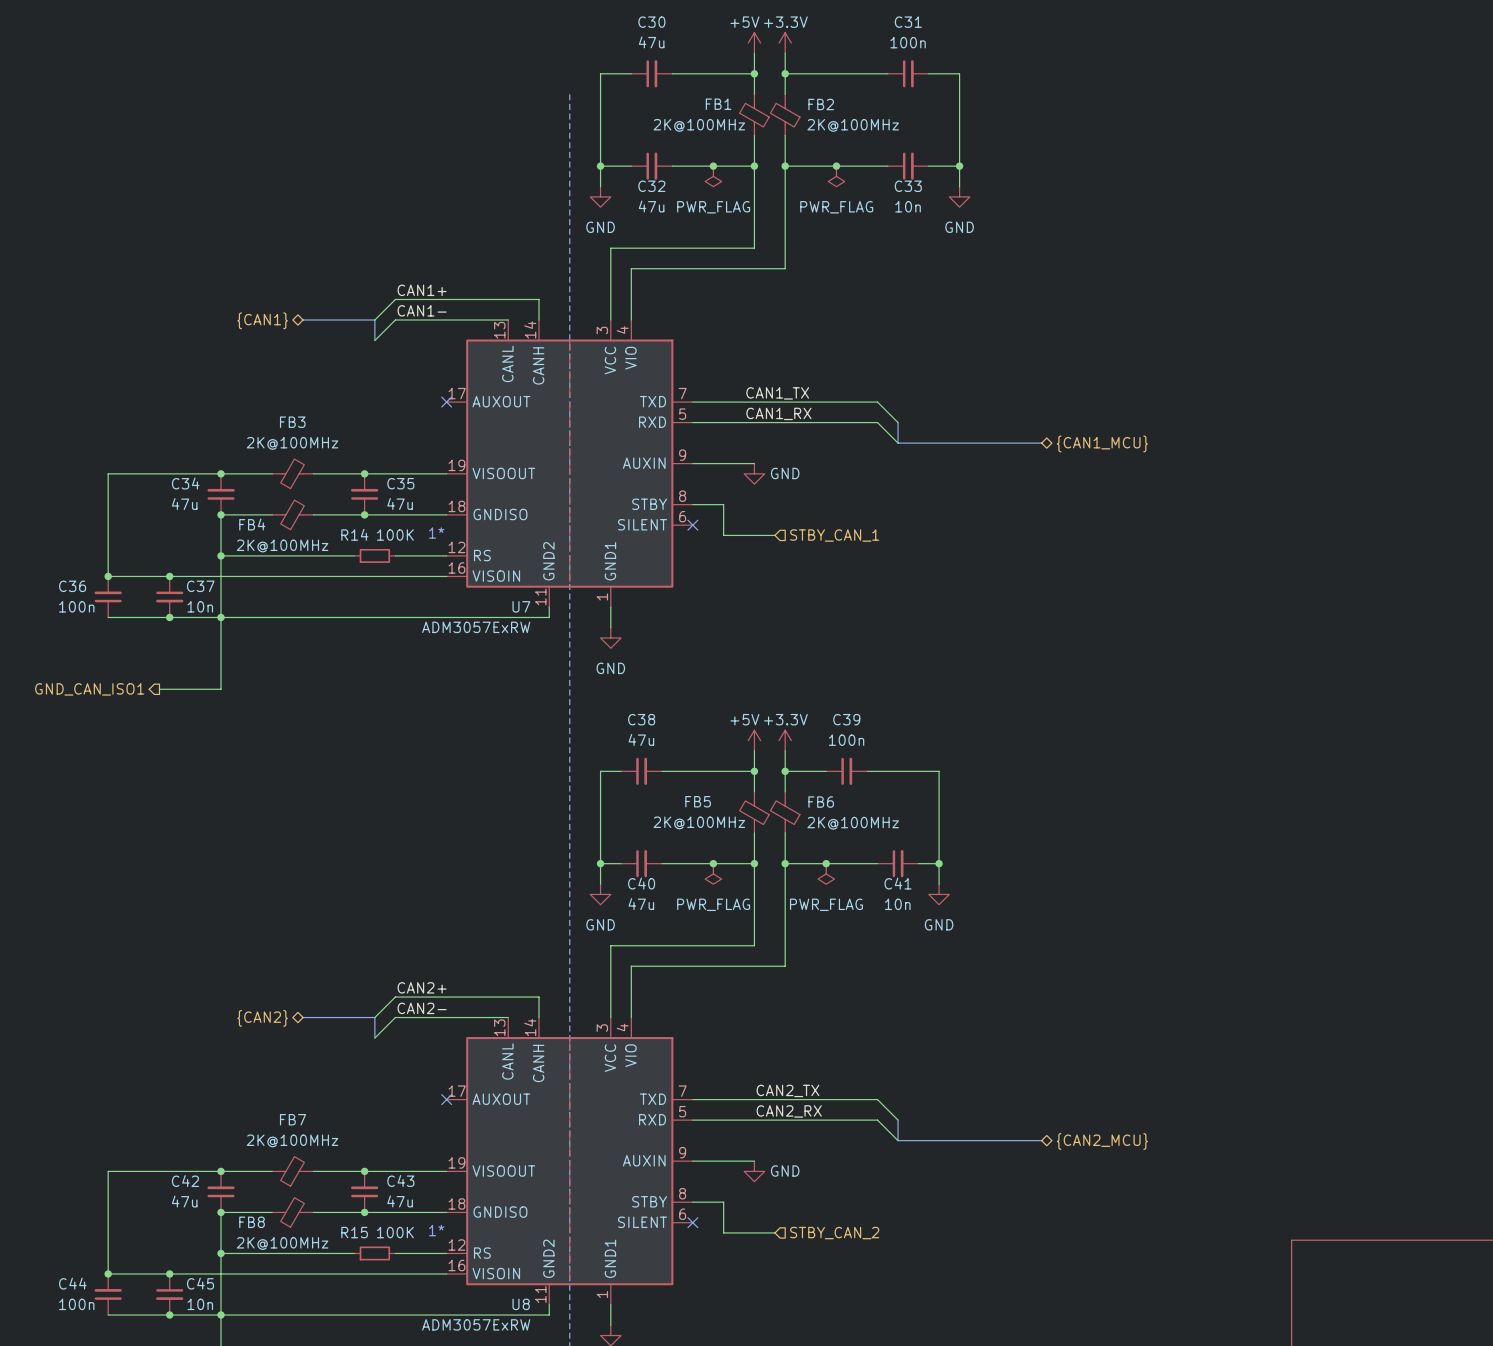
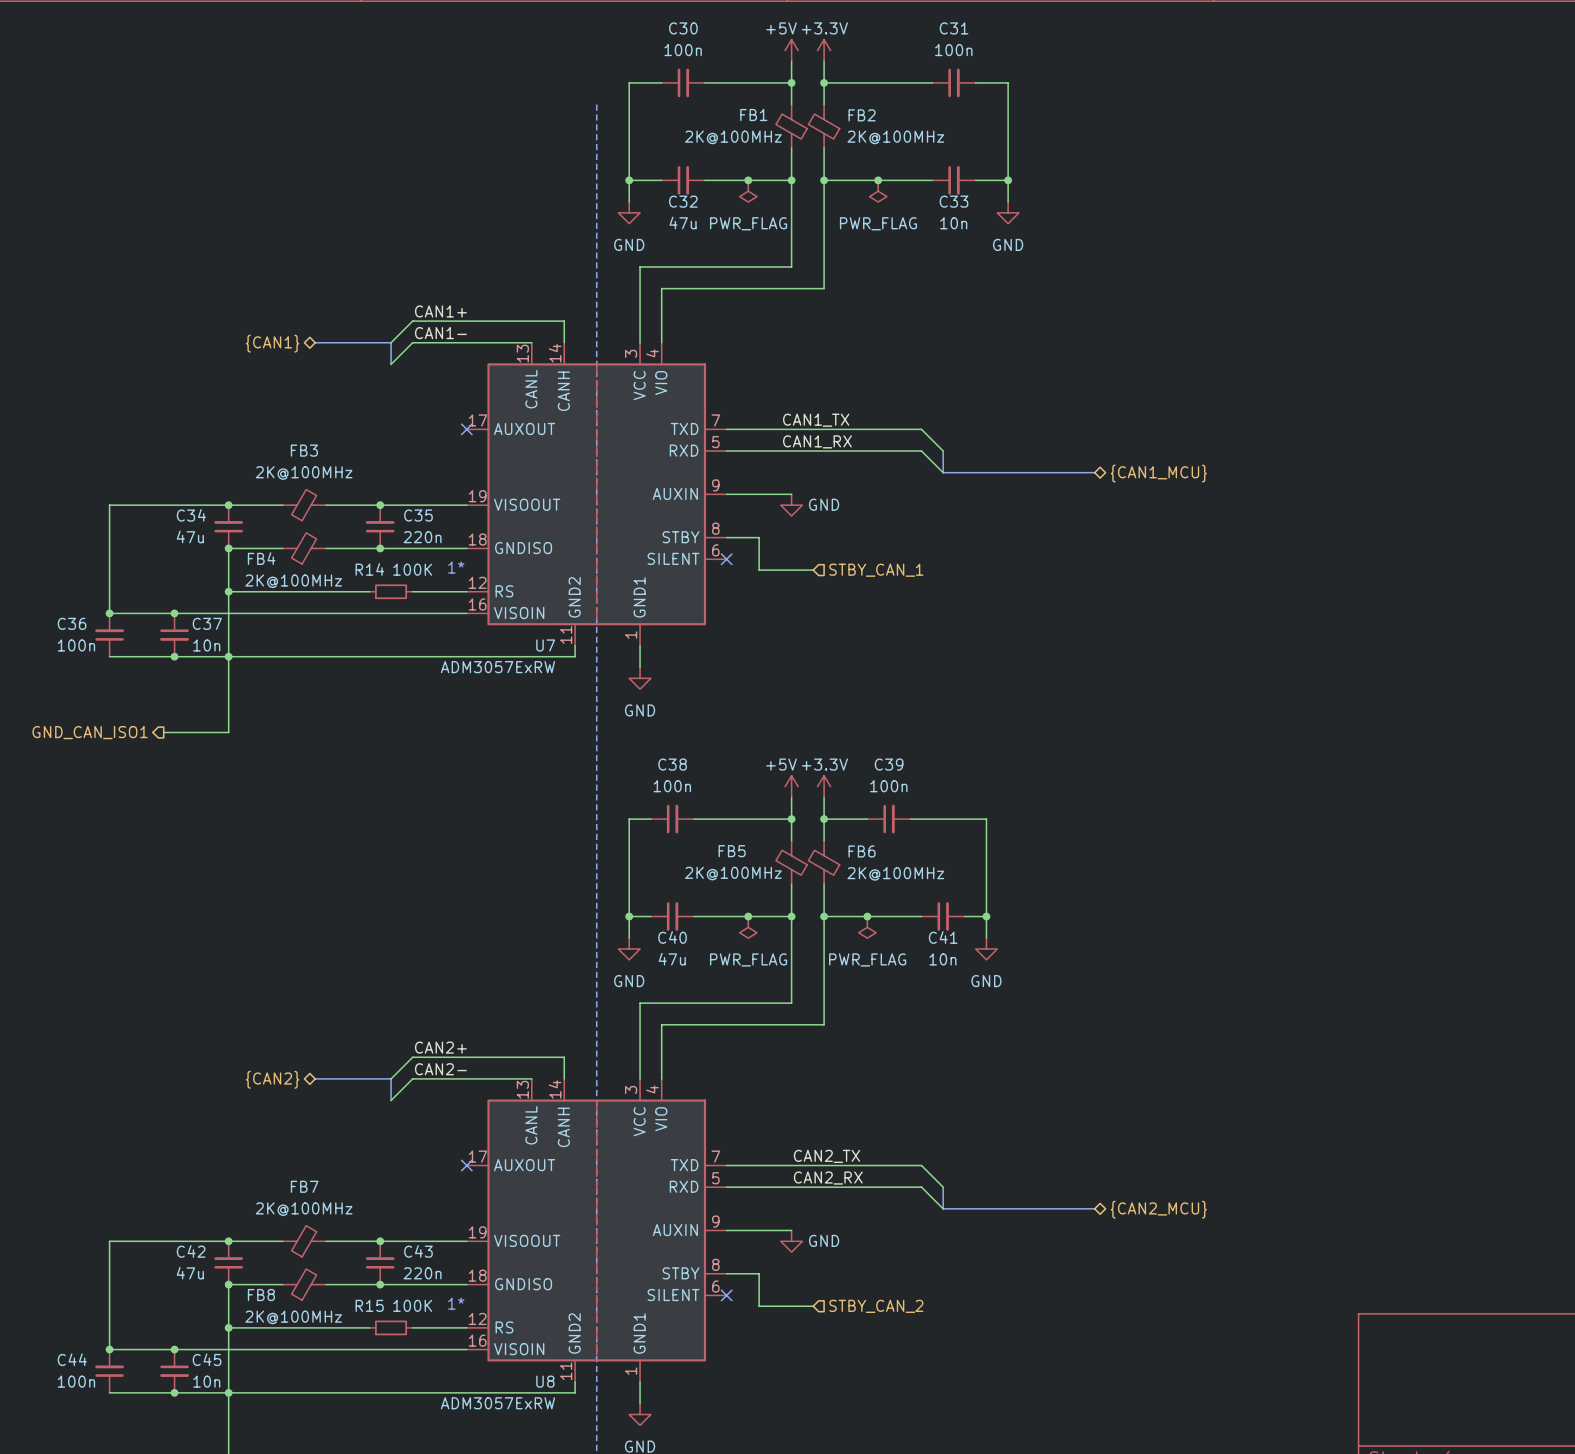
C30 value: 47u (651, 42) -> 100n (683, 50)
C35 value: 47u (400, 503) -> 220n (422, 537)
C38 value: 47u (641, 739) -> 100n (672, 786)
C43 value: 47u (400, 1201) -> 220n (422, 1273)

